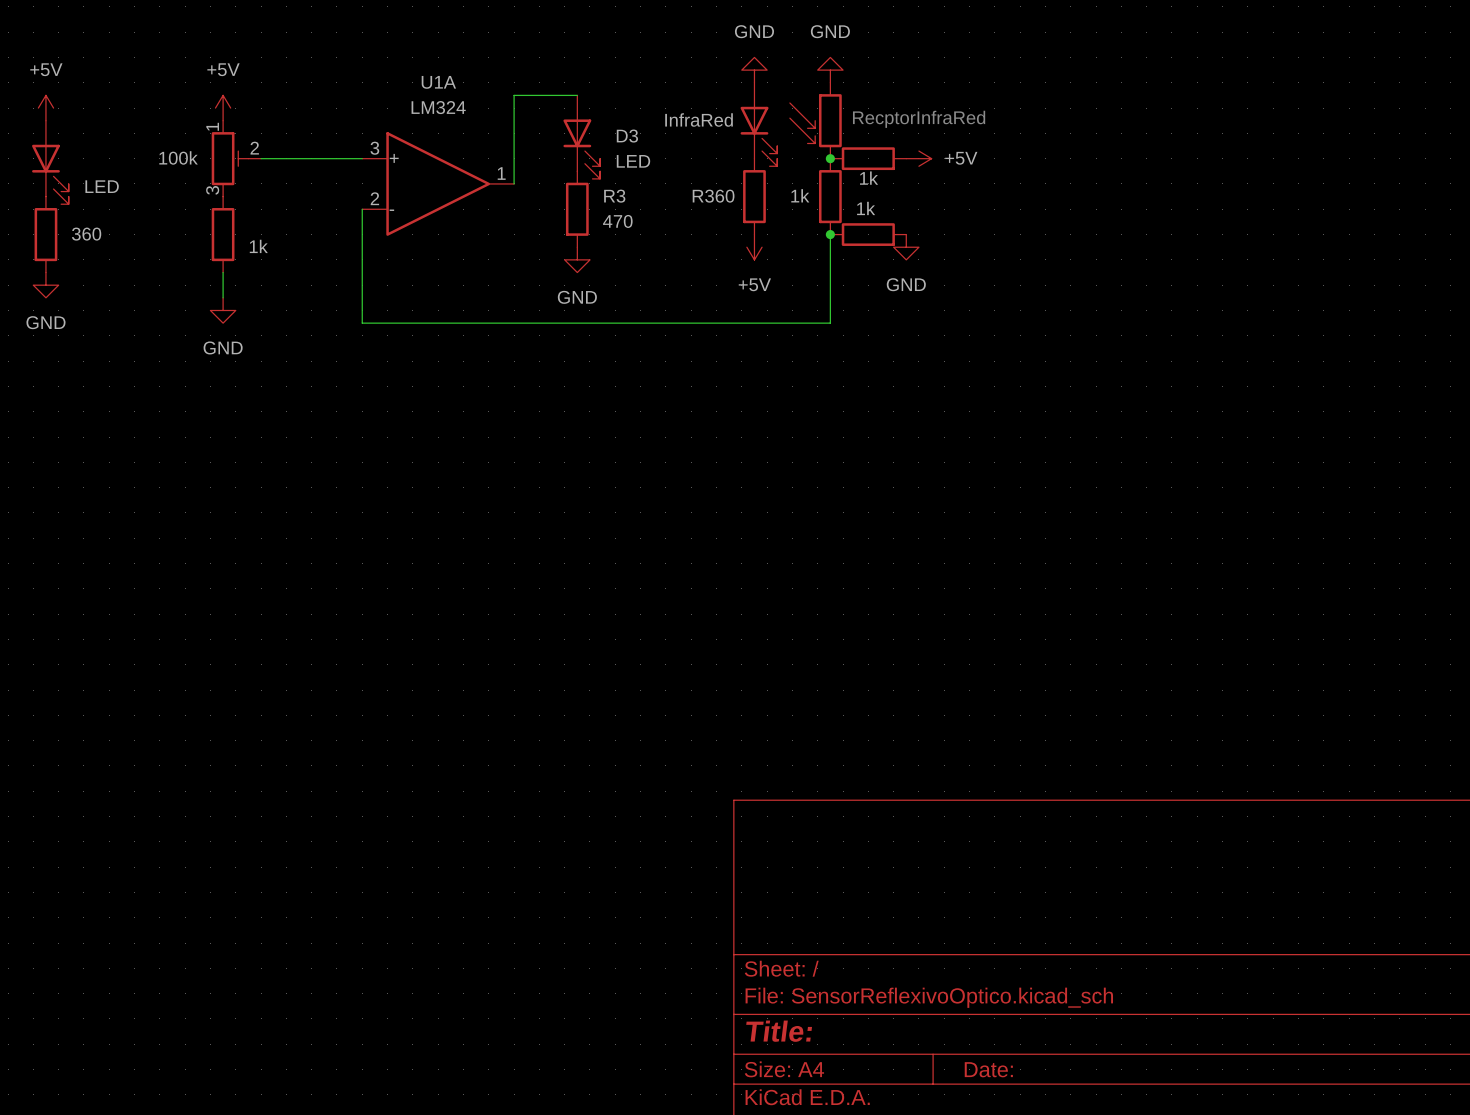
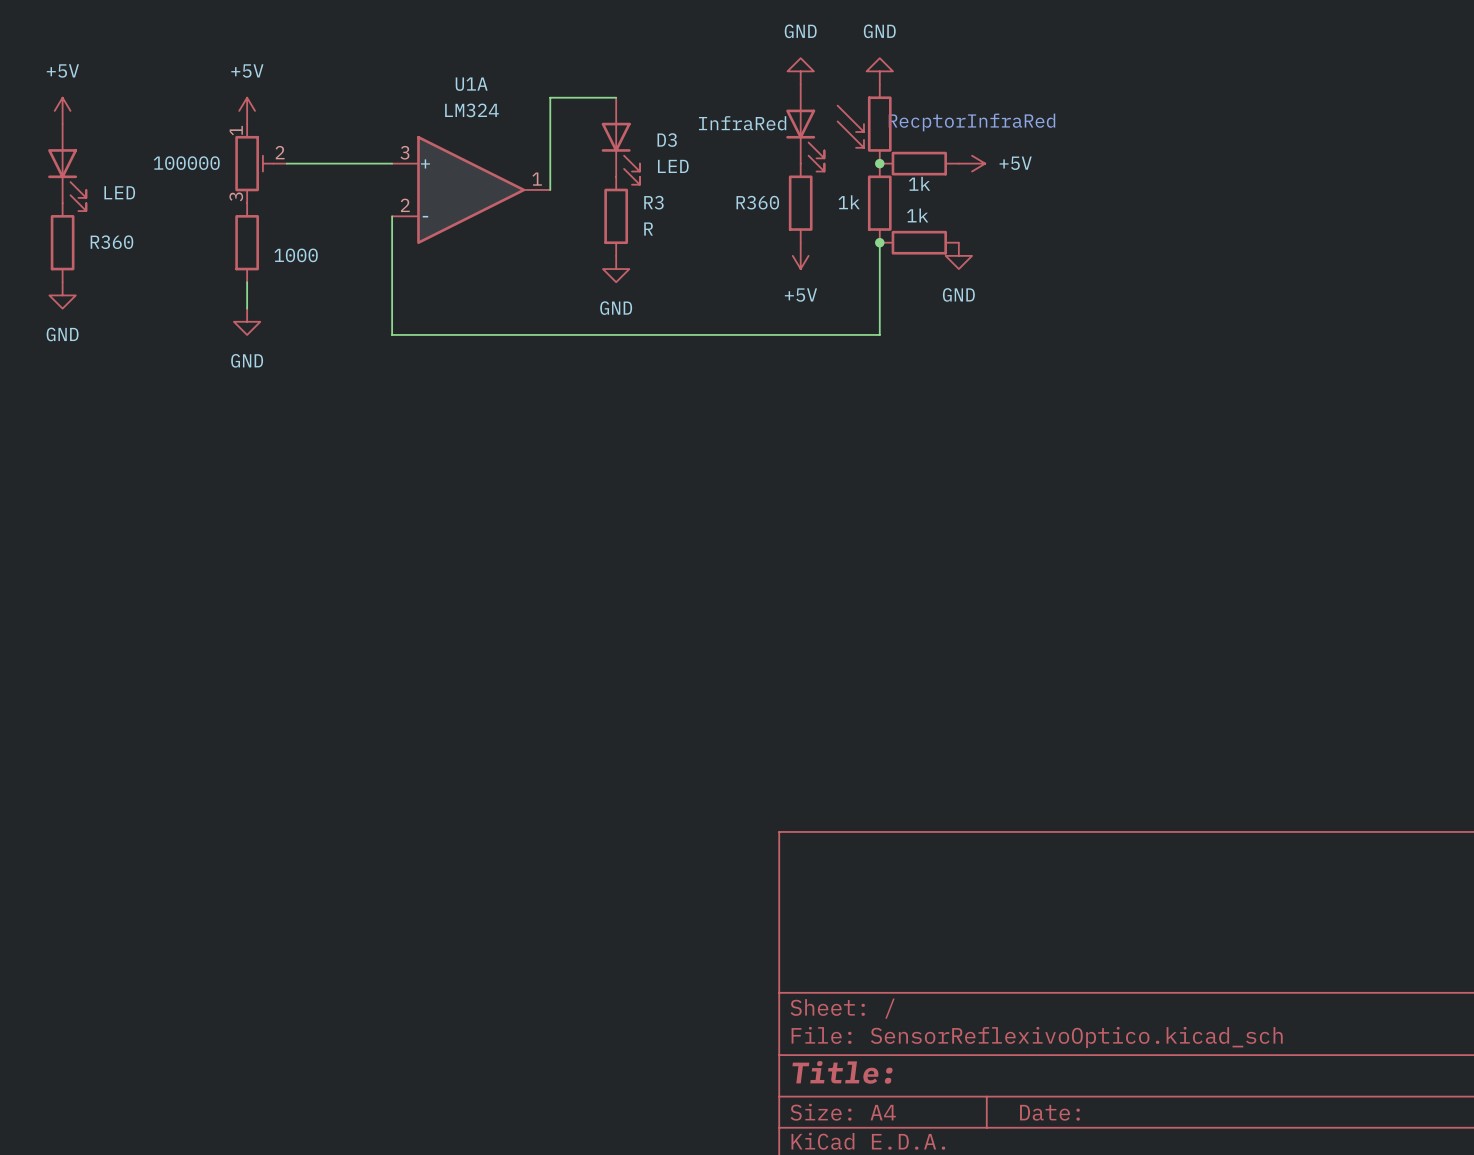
part value: 100k (178, 157) -> 100000 (186, 163)
R3 value: 470 (617, 221) -> R (648, 229)
part value: 360 (86, 234) -> R360 (111, 242)
part value: 1k (258, 246) -> 1000 (296, 255)

